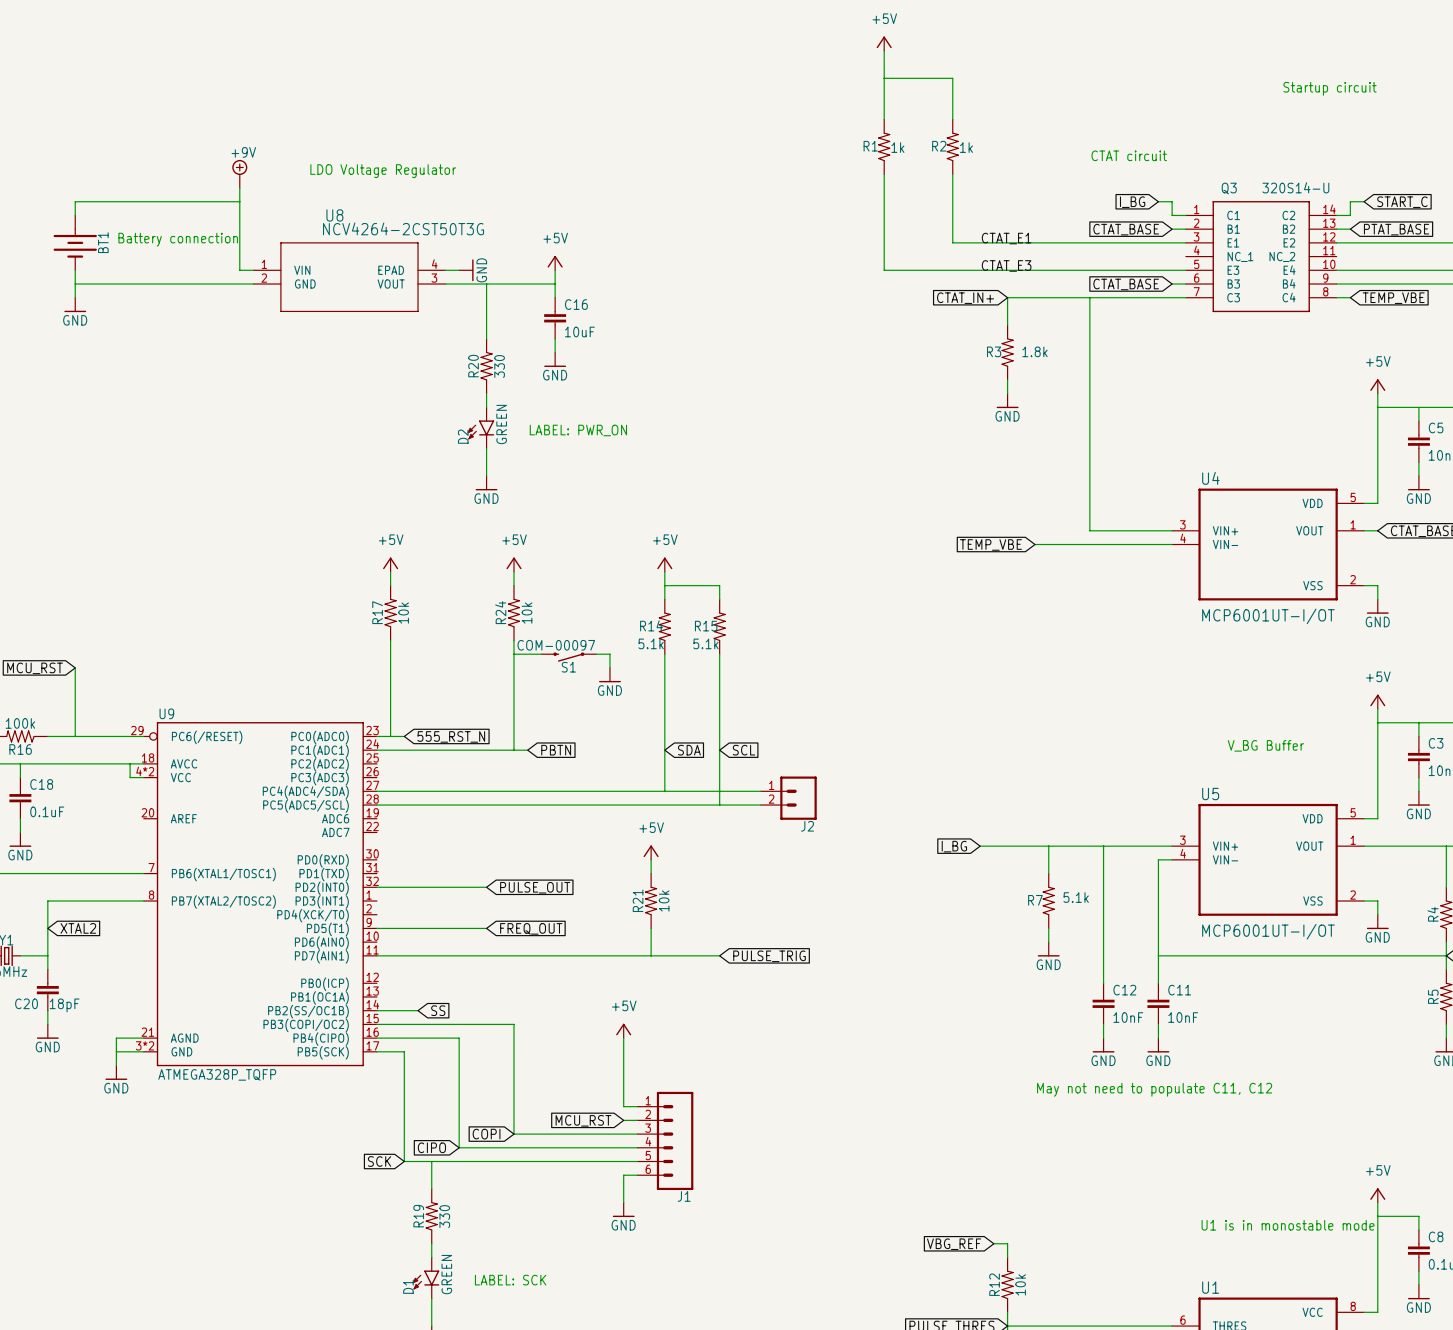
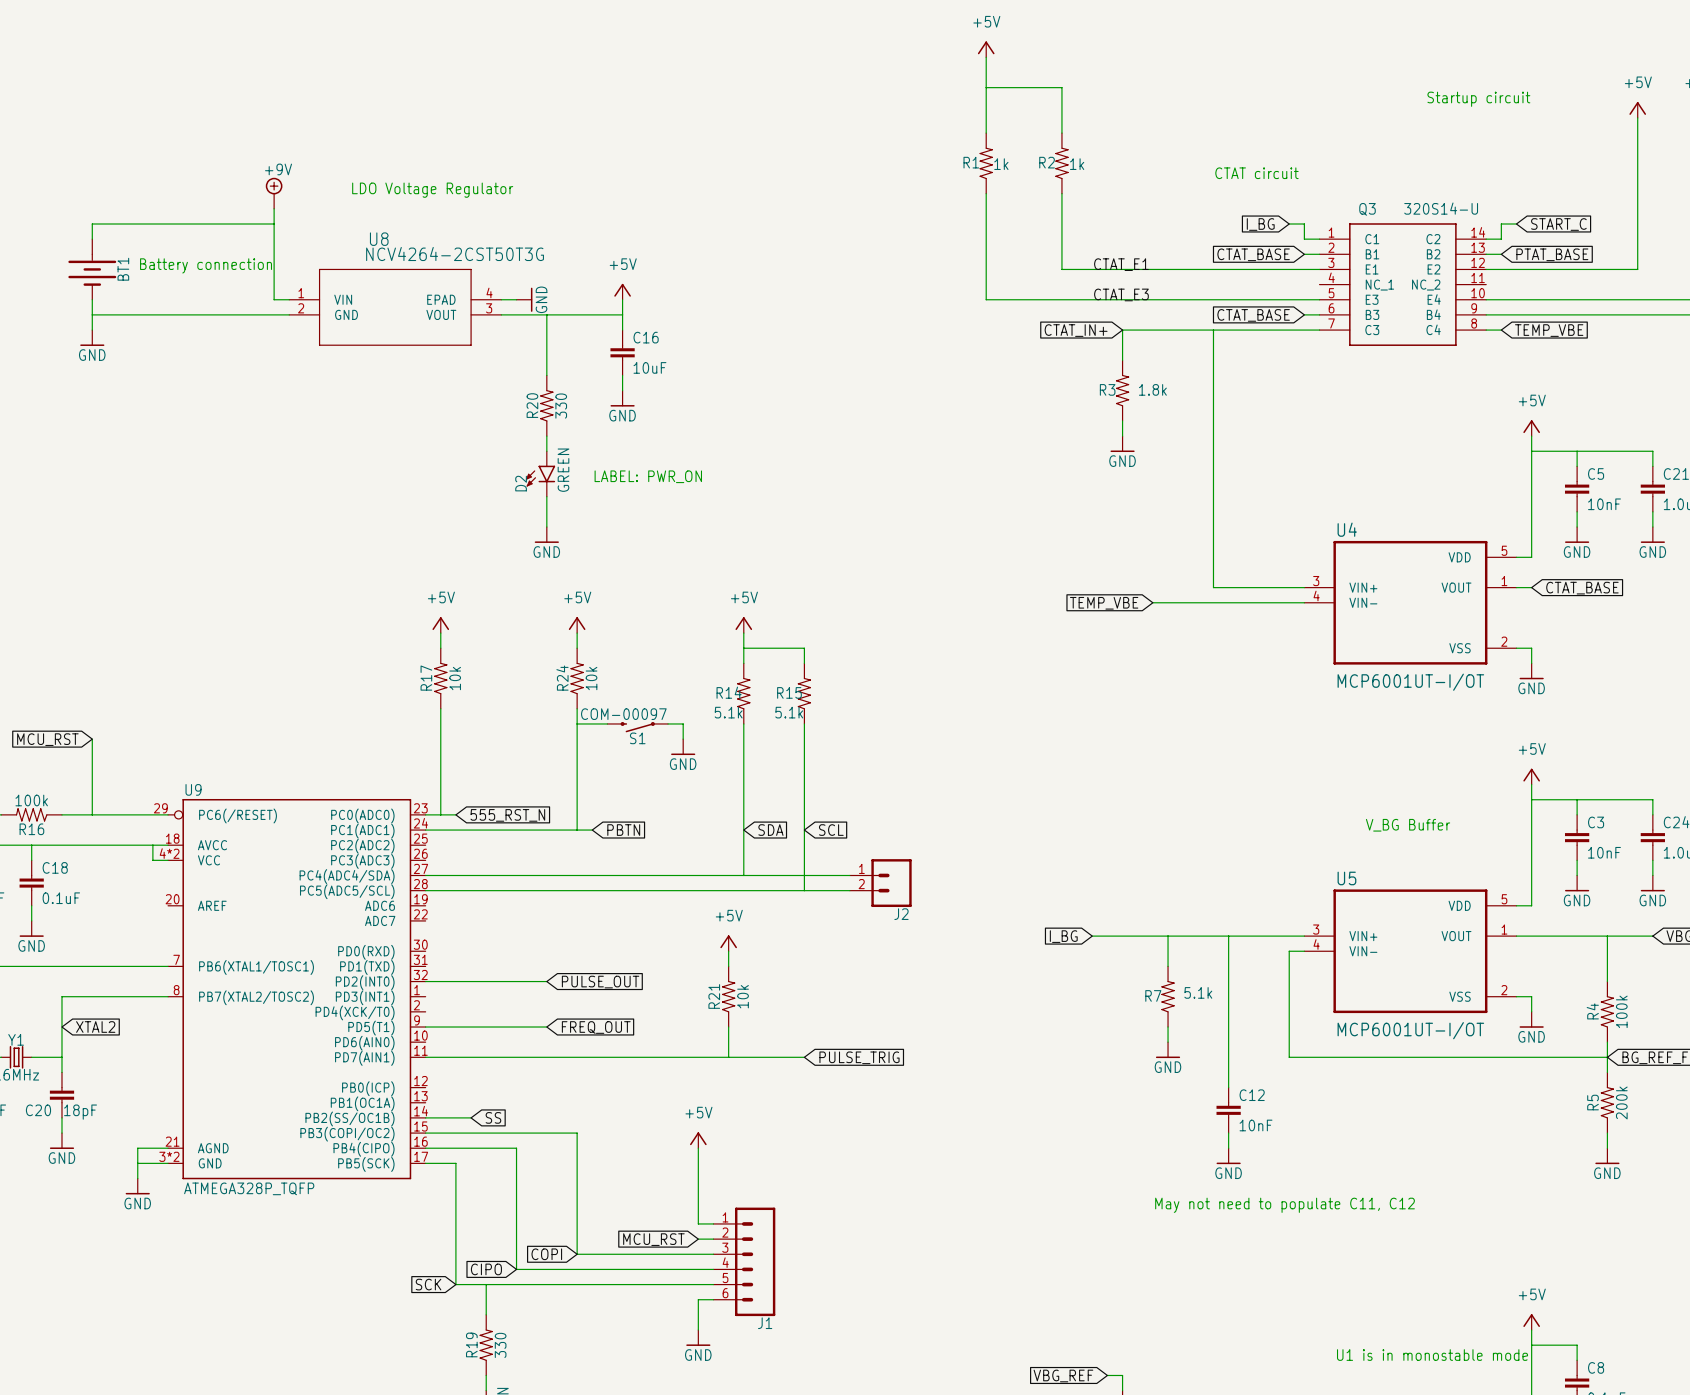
wire: (1158, 955) (1158, 983) -> none
C11: 10nF (1158, 1003) -> none
wire: (1158, 1024) (1158, 1038) -> none
power symbol: GND (1158, 1045) -> none

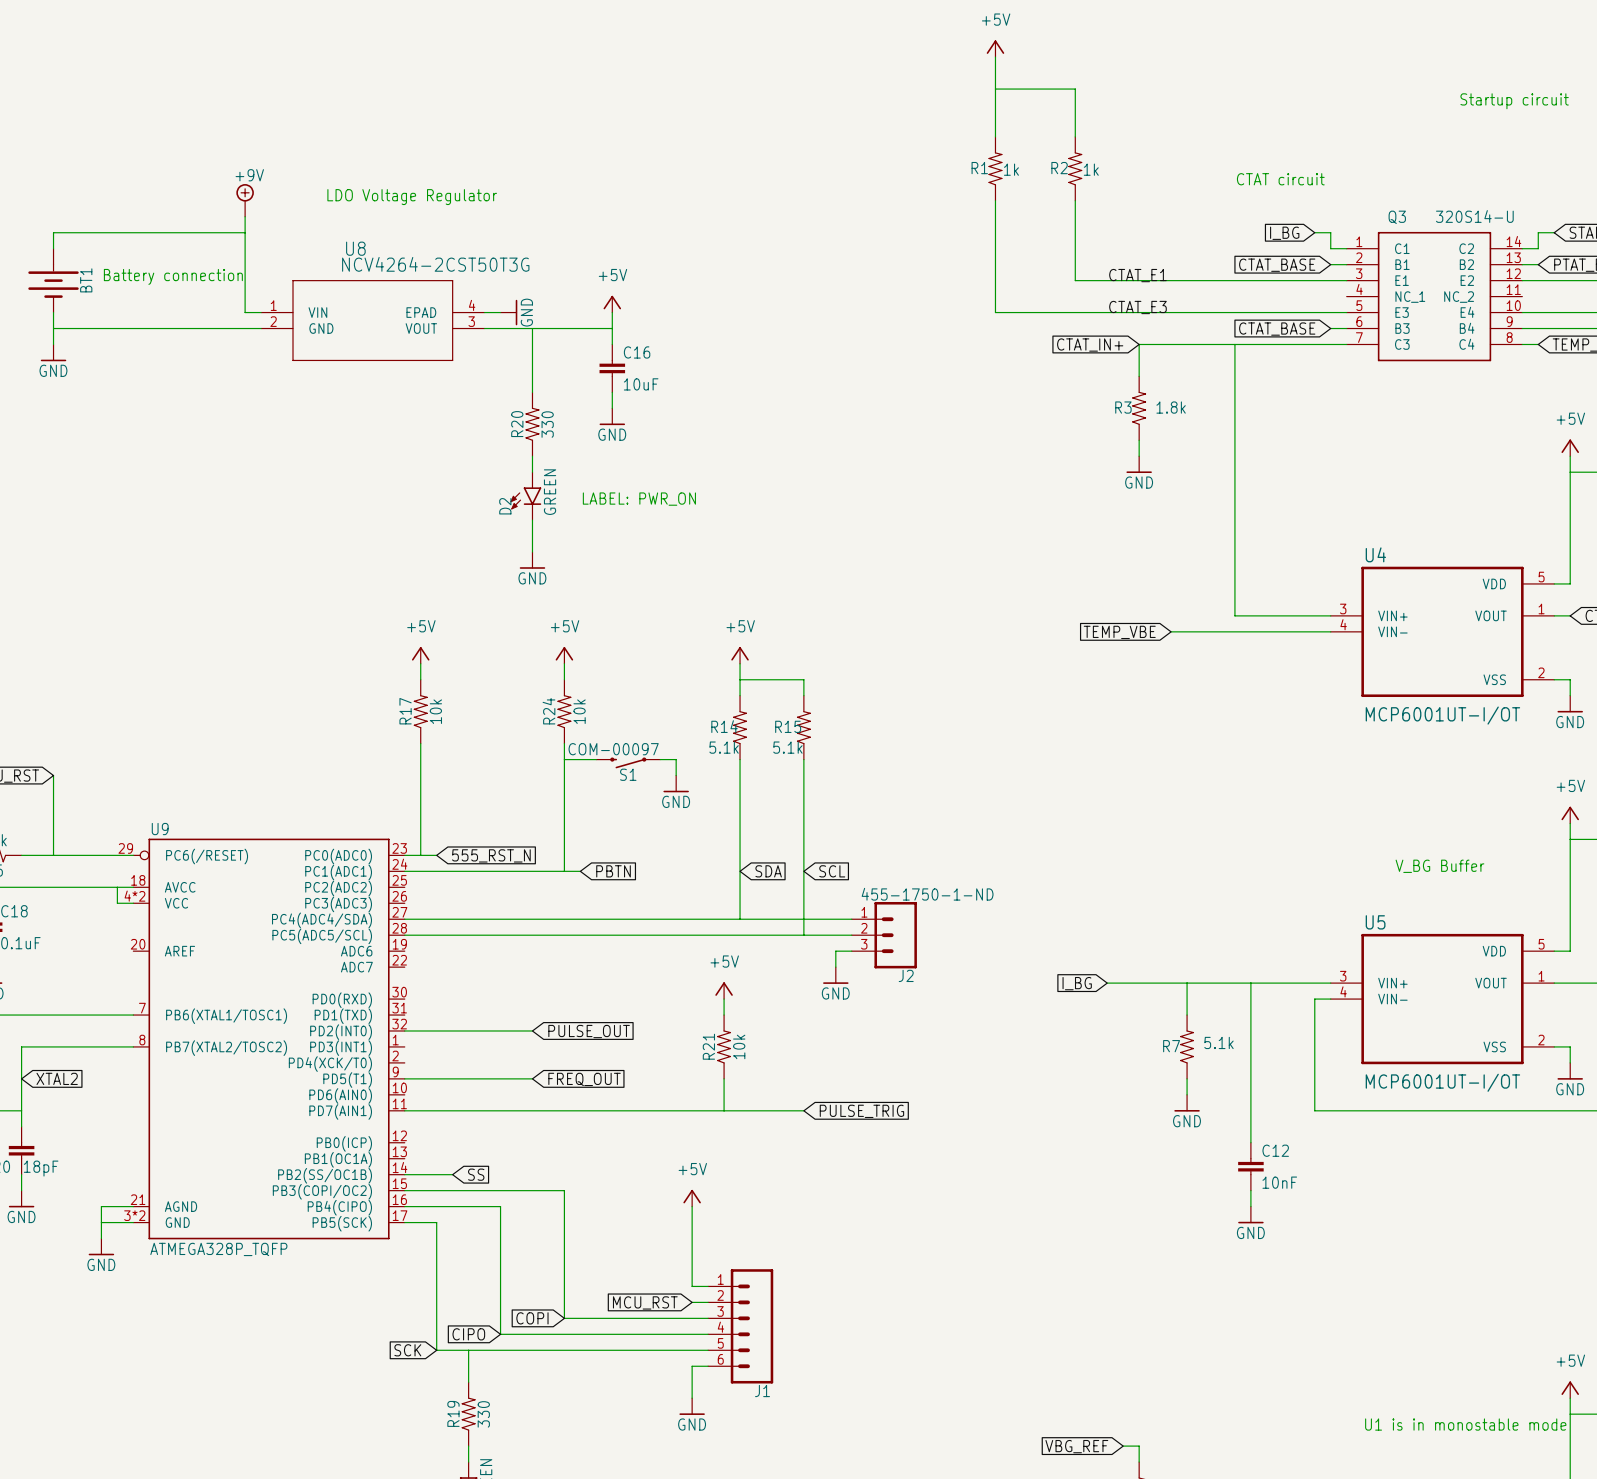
J2 value: none -> 455-1750-1-ND (927, 894)
J2 symbol: [849, 859, 912, 908] -> [851, 901, 917, 969]
wire: none -> (851, 951) (835, 951) (835, 967)
power symbol: none -> GND (835, 975)
text: May not need to populate C11, C12 (1285, 1205) -> none

